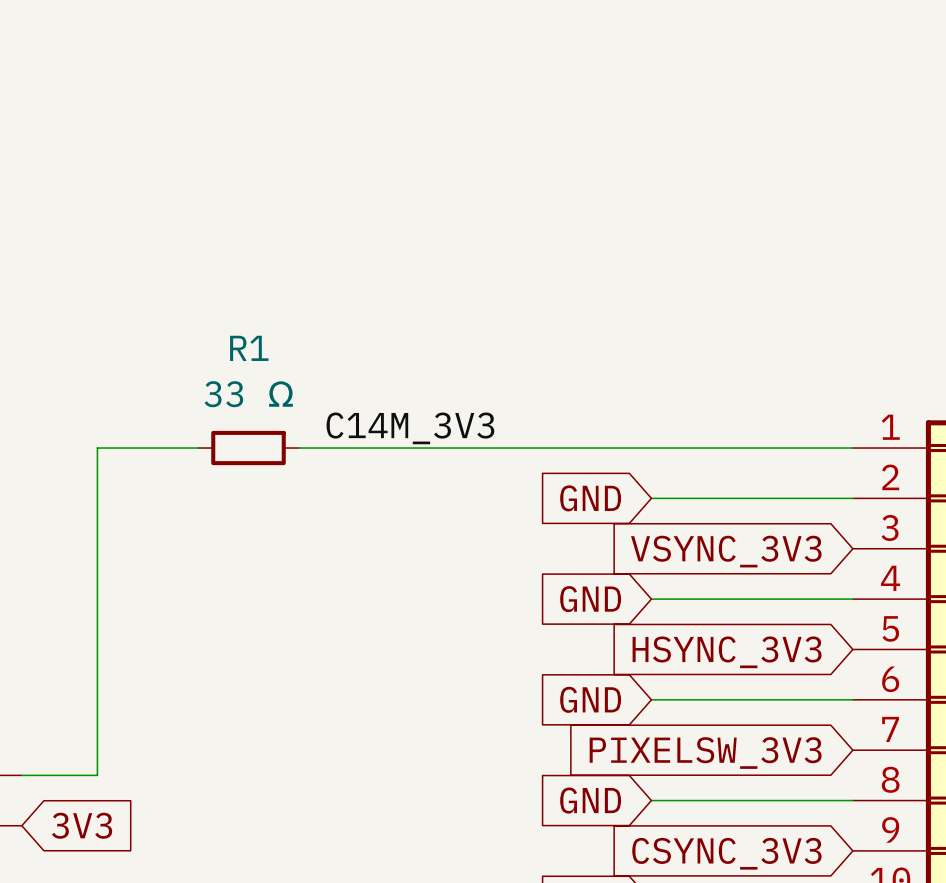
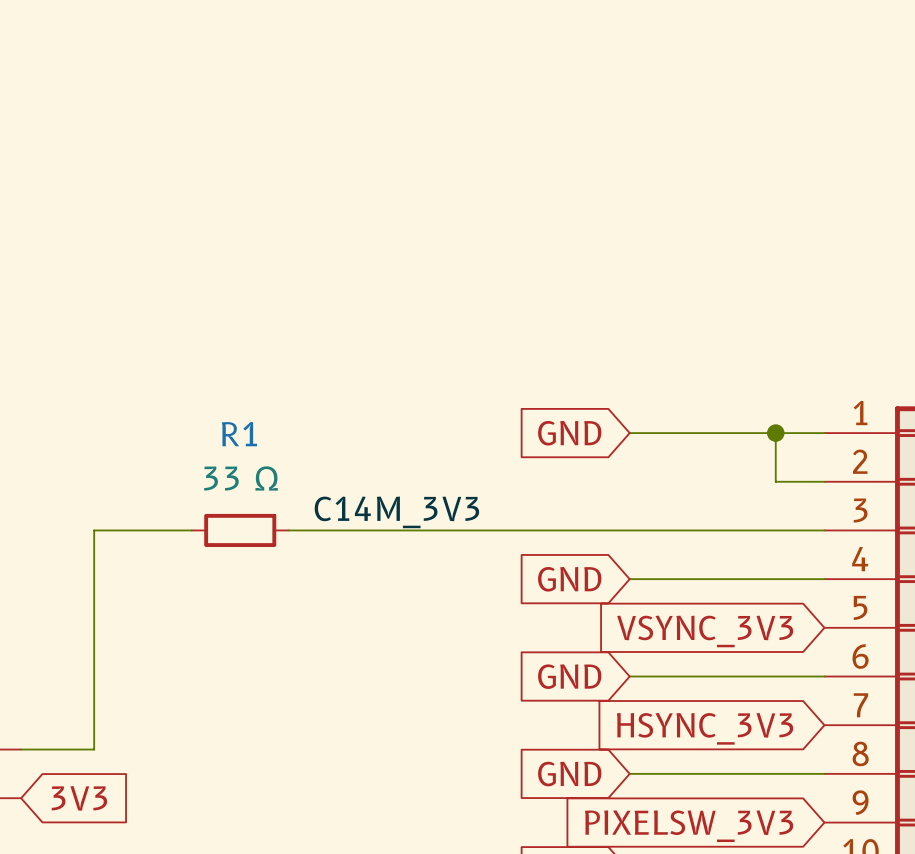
label position: C14M_3V3 (410, 428) -> C14M_3V3 (396, 512)
wire: (198, 448) (97, 448) (97, 548) -> (191, 530) (94, 530)
R1 position: (248, 448) -> (240, 530)
wire: (298, 448) (651, 448) -> none
junction: none -> (775, 433)
global label position: GND (590, 498) -> GND (569, 433)
wire: (651, 498) (802, 498) -> (775, 433) (775, 481)
wire: none -> (288, 530) (824, 530)
global label: VSYNC_3V3 (726, 551) -> none
global label: HSYNC_3V3 (727, 652) -> VSYNC_3V3 (705, 631)
global label: PIXELSW_3V3 (705, 753) -> HSYNC_3V3 (705, 728)
global label: CSYNC_3V3 (726, 853) -> PIXELSW_3V3 (689, 826)

